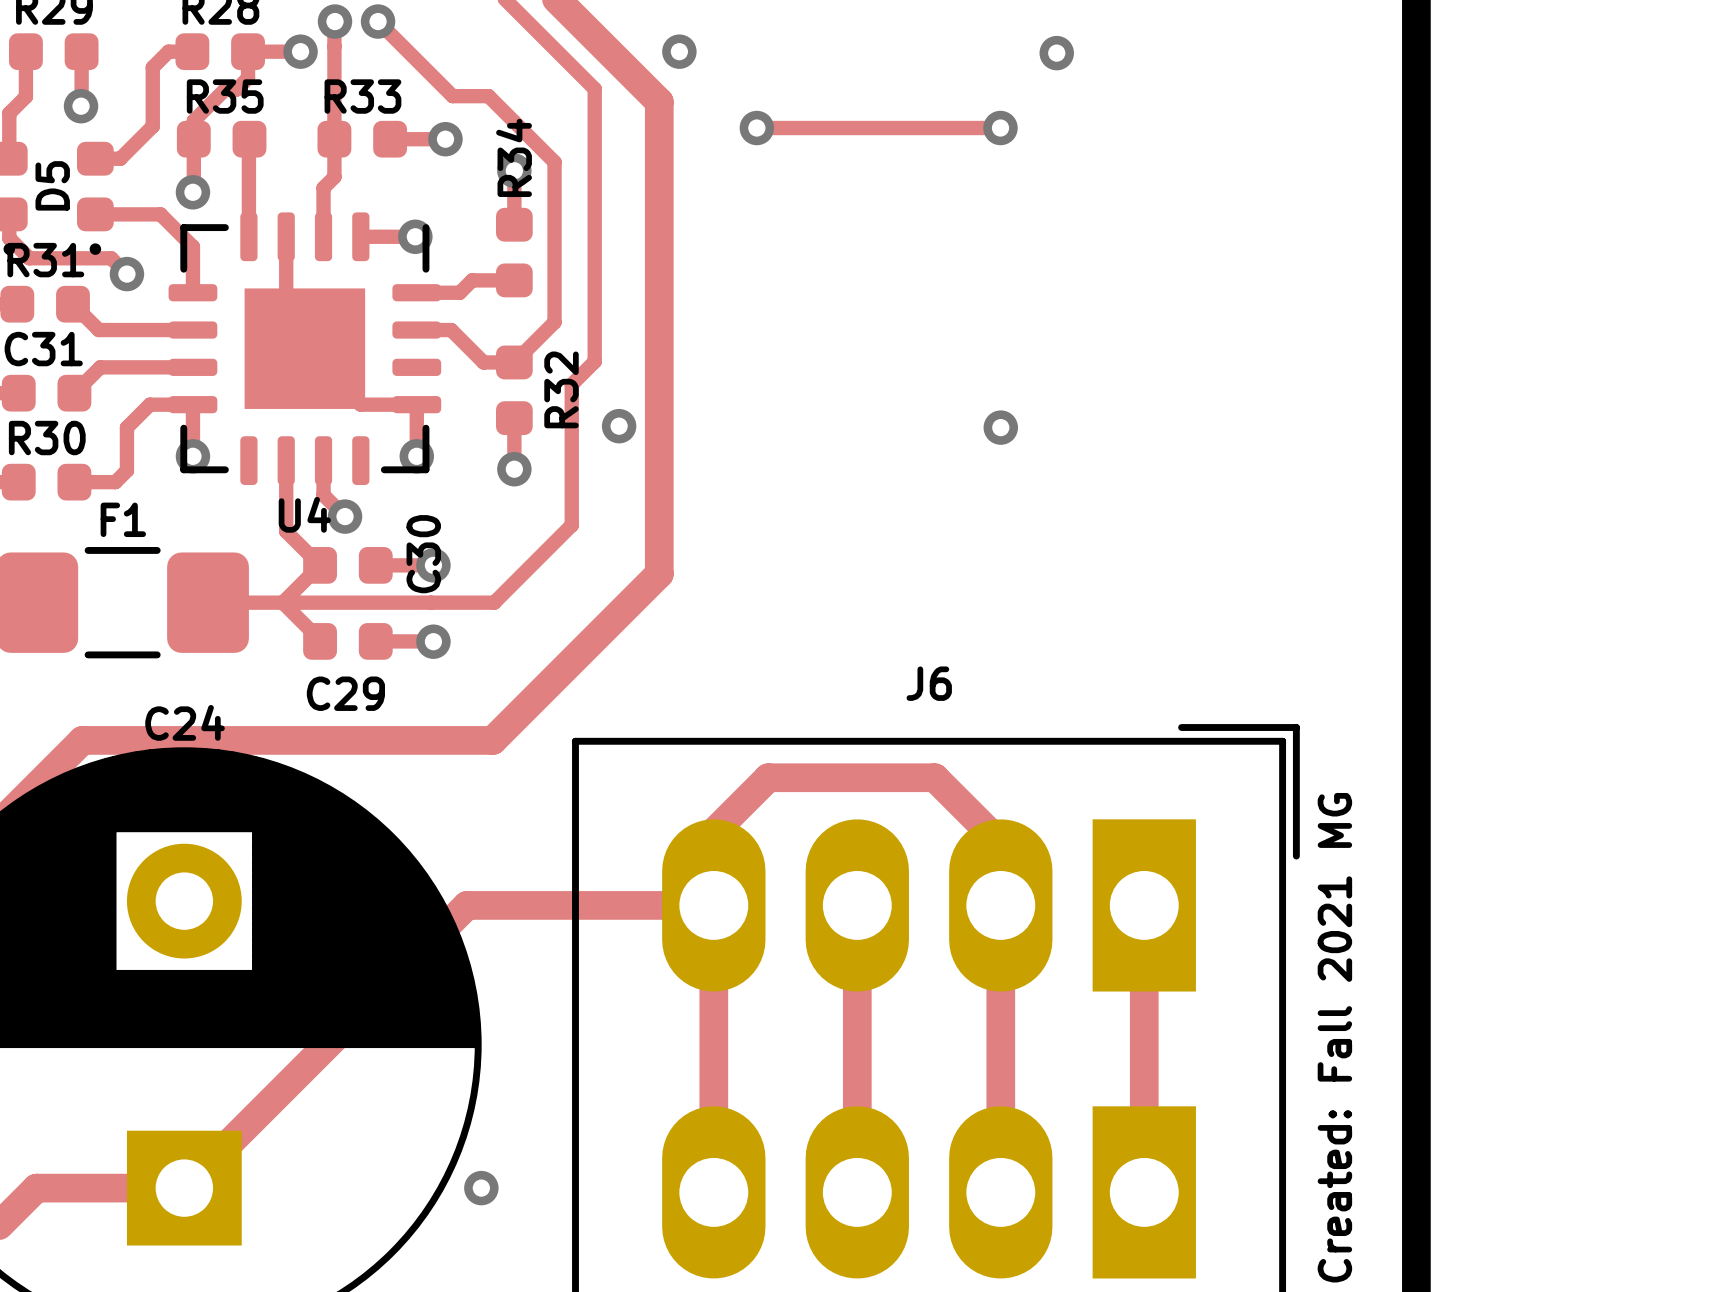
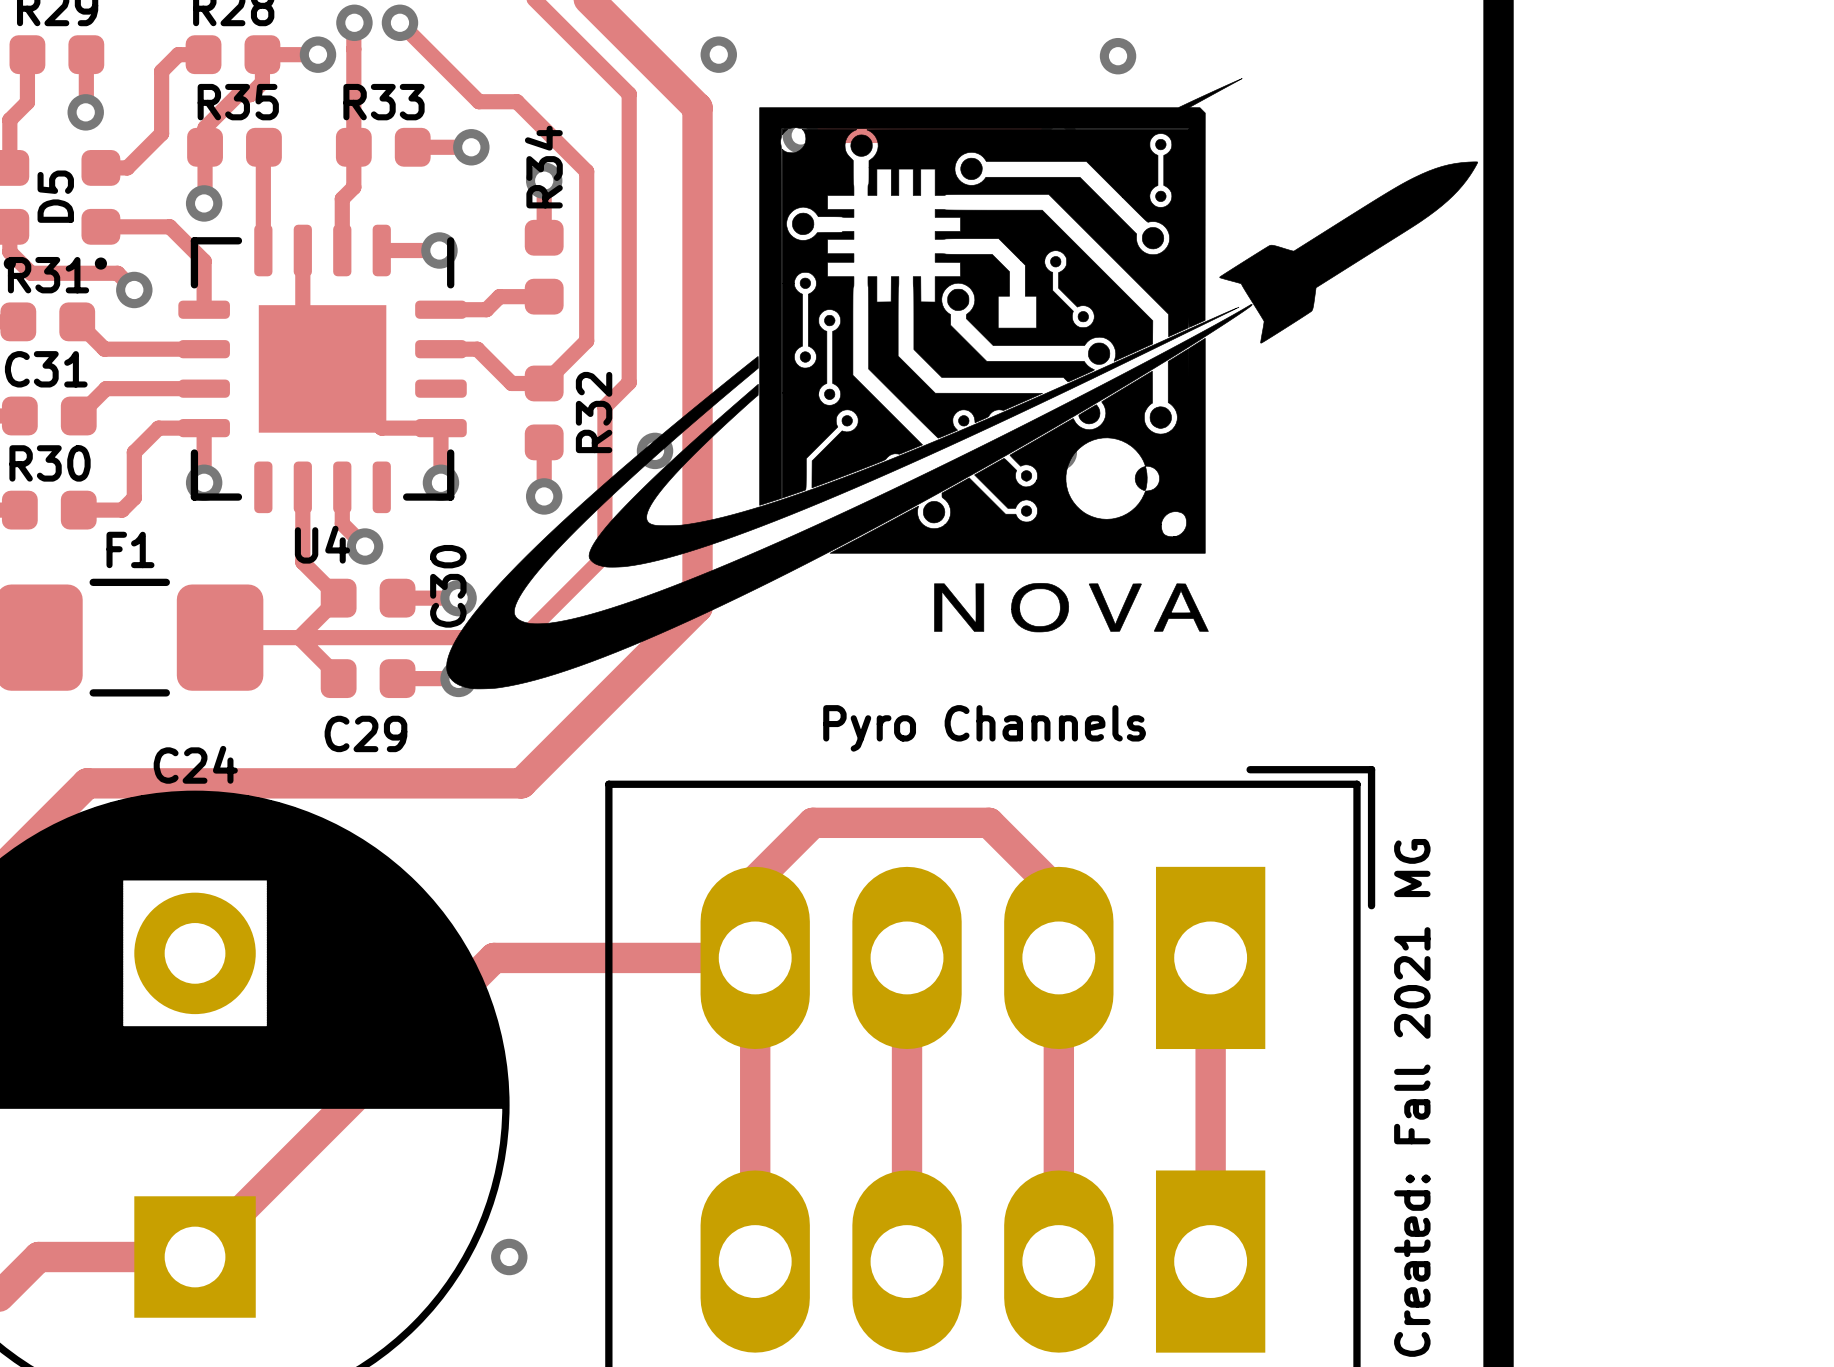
drawing: none -> [446, 78, 1479, 690]
J6 name: J6 (929, 683) -> Pyro Channels (984, 728)

